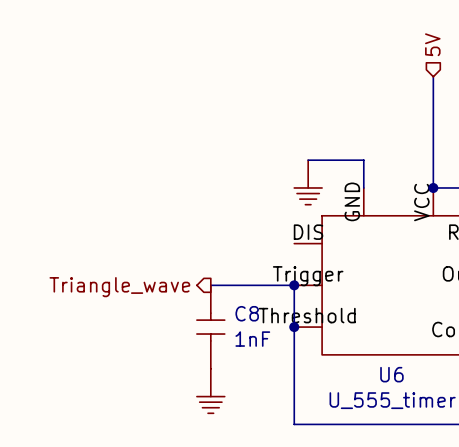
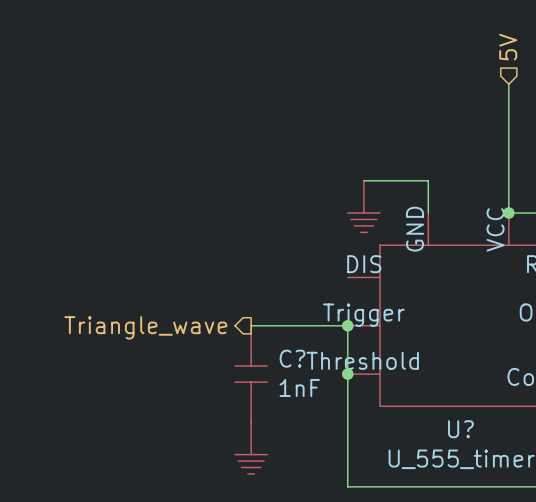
C8 name: C8 (247, 313) -> C? (292, 358)
U6 name: U6 (391, 374) -> U? (460, 429)

